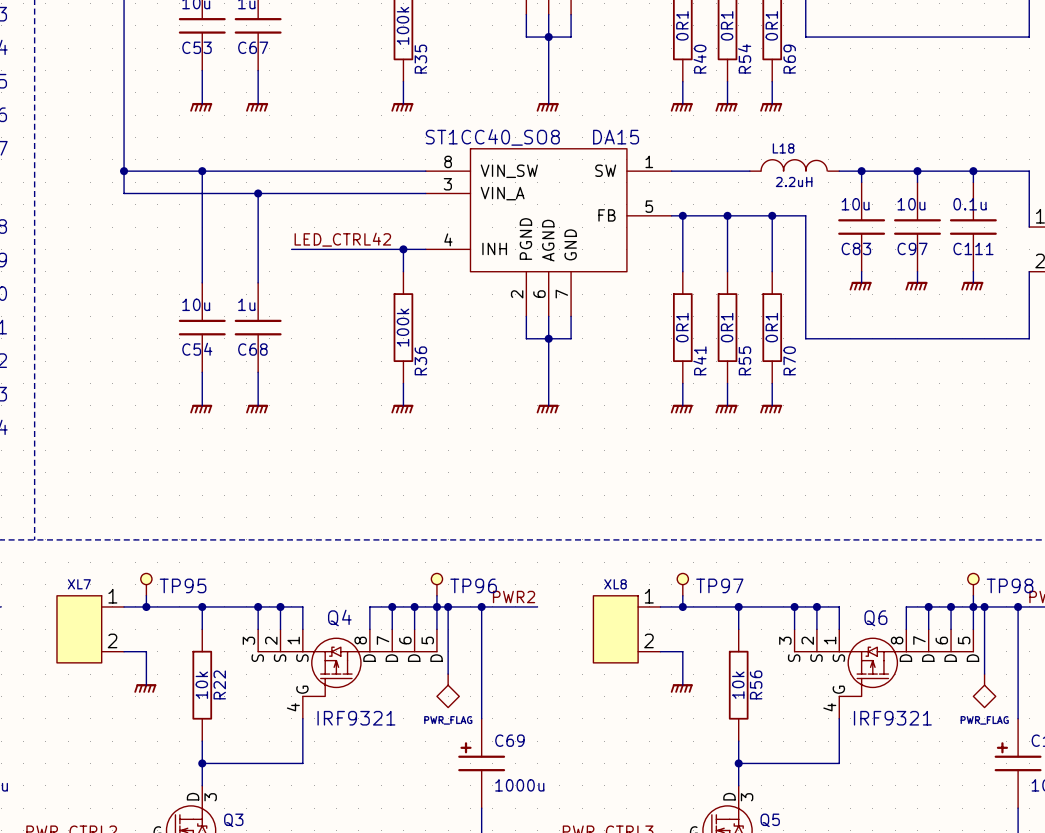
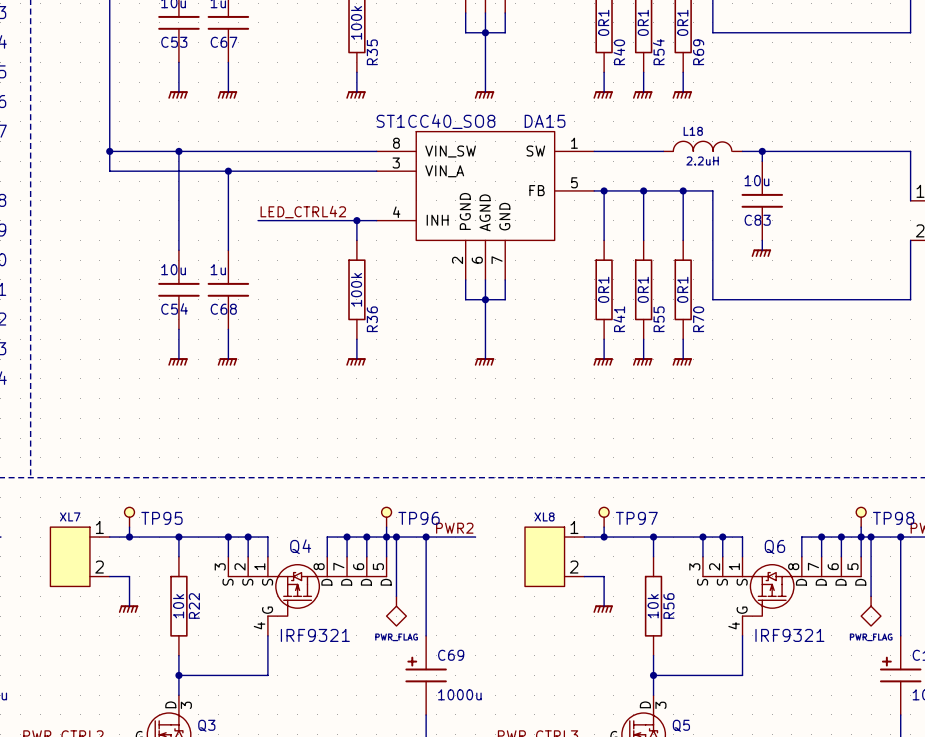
wire: (917, 171) (917, 182) -> none
junction: (917, 171) -> none
wire: (973, 171) (973, 182) -> none
junction: (973, 171) -> none
C97: 10u (917, 227) -> none
C111: 0.1u (973, 227) -> none
wire: (917, 271) (917, 282) -> none
wire: (973, 271) (973, 282) -> none
power symbol: (916, 286) -> none
power symbol: (972, 286) -> none

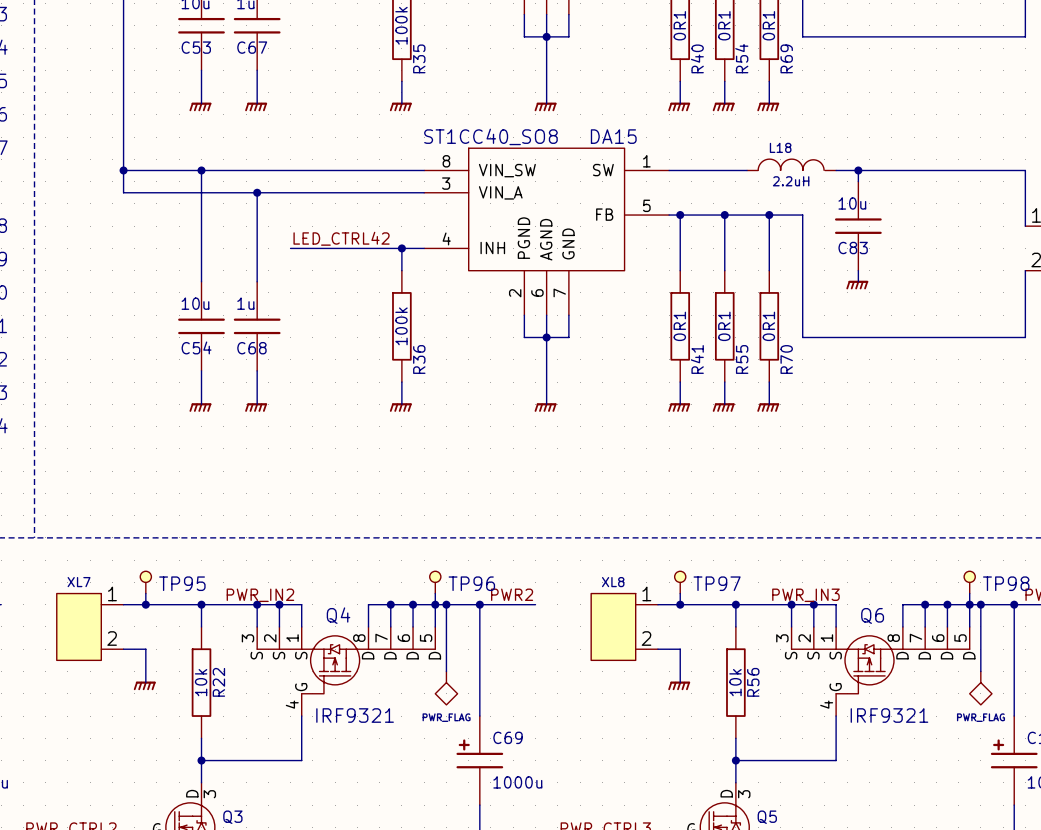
label: none -> PWR_IN2 (260, 595)
label: none -> PWR_IN3 (805, 595)

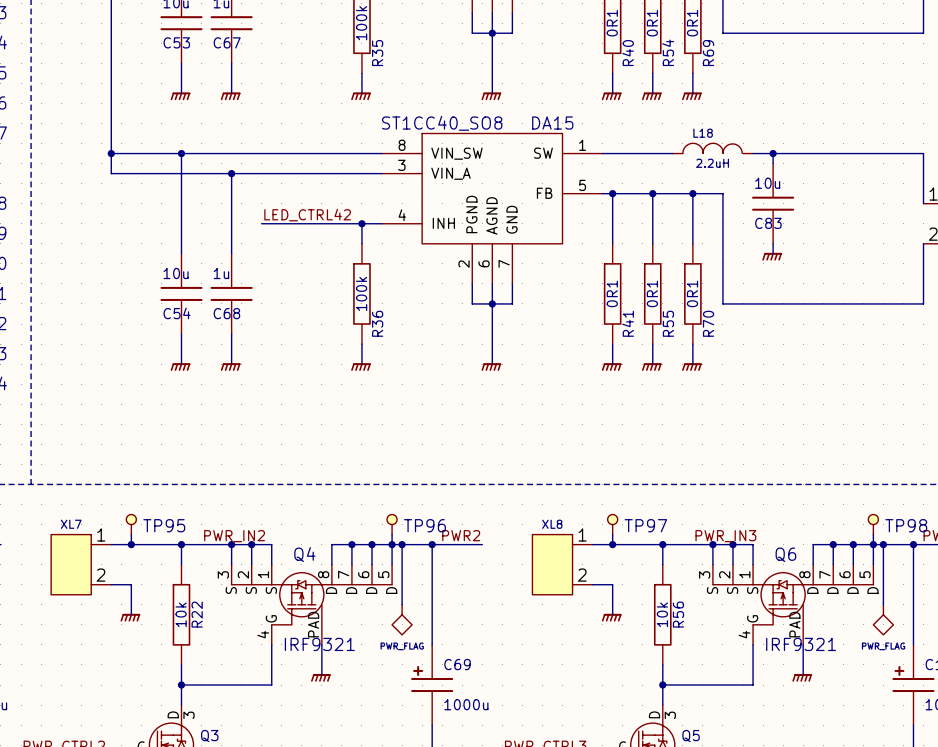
Q4 symbol: [257, 626, 436, 717] -> [231, 564, 393, 645]
Q6 symbol: [791, 626, 970, 717] -> [712, 564, 874, 645]
wire: none -> (321, 644) (321, 674)
wire: none -> (803, 644) (803, 674)
power symbol: none -> (320, 677)
power symbol: none -> (802, 677)

